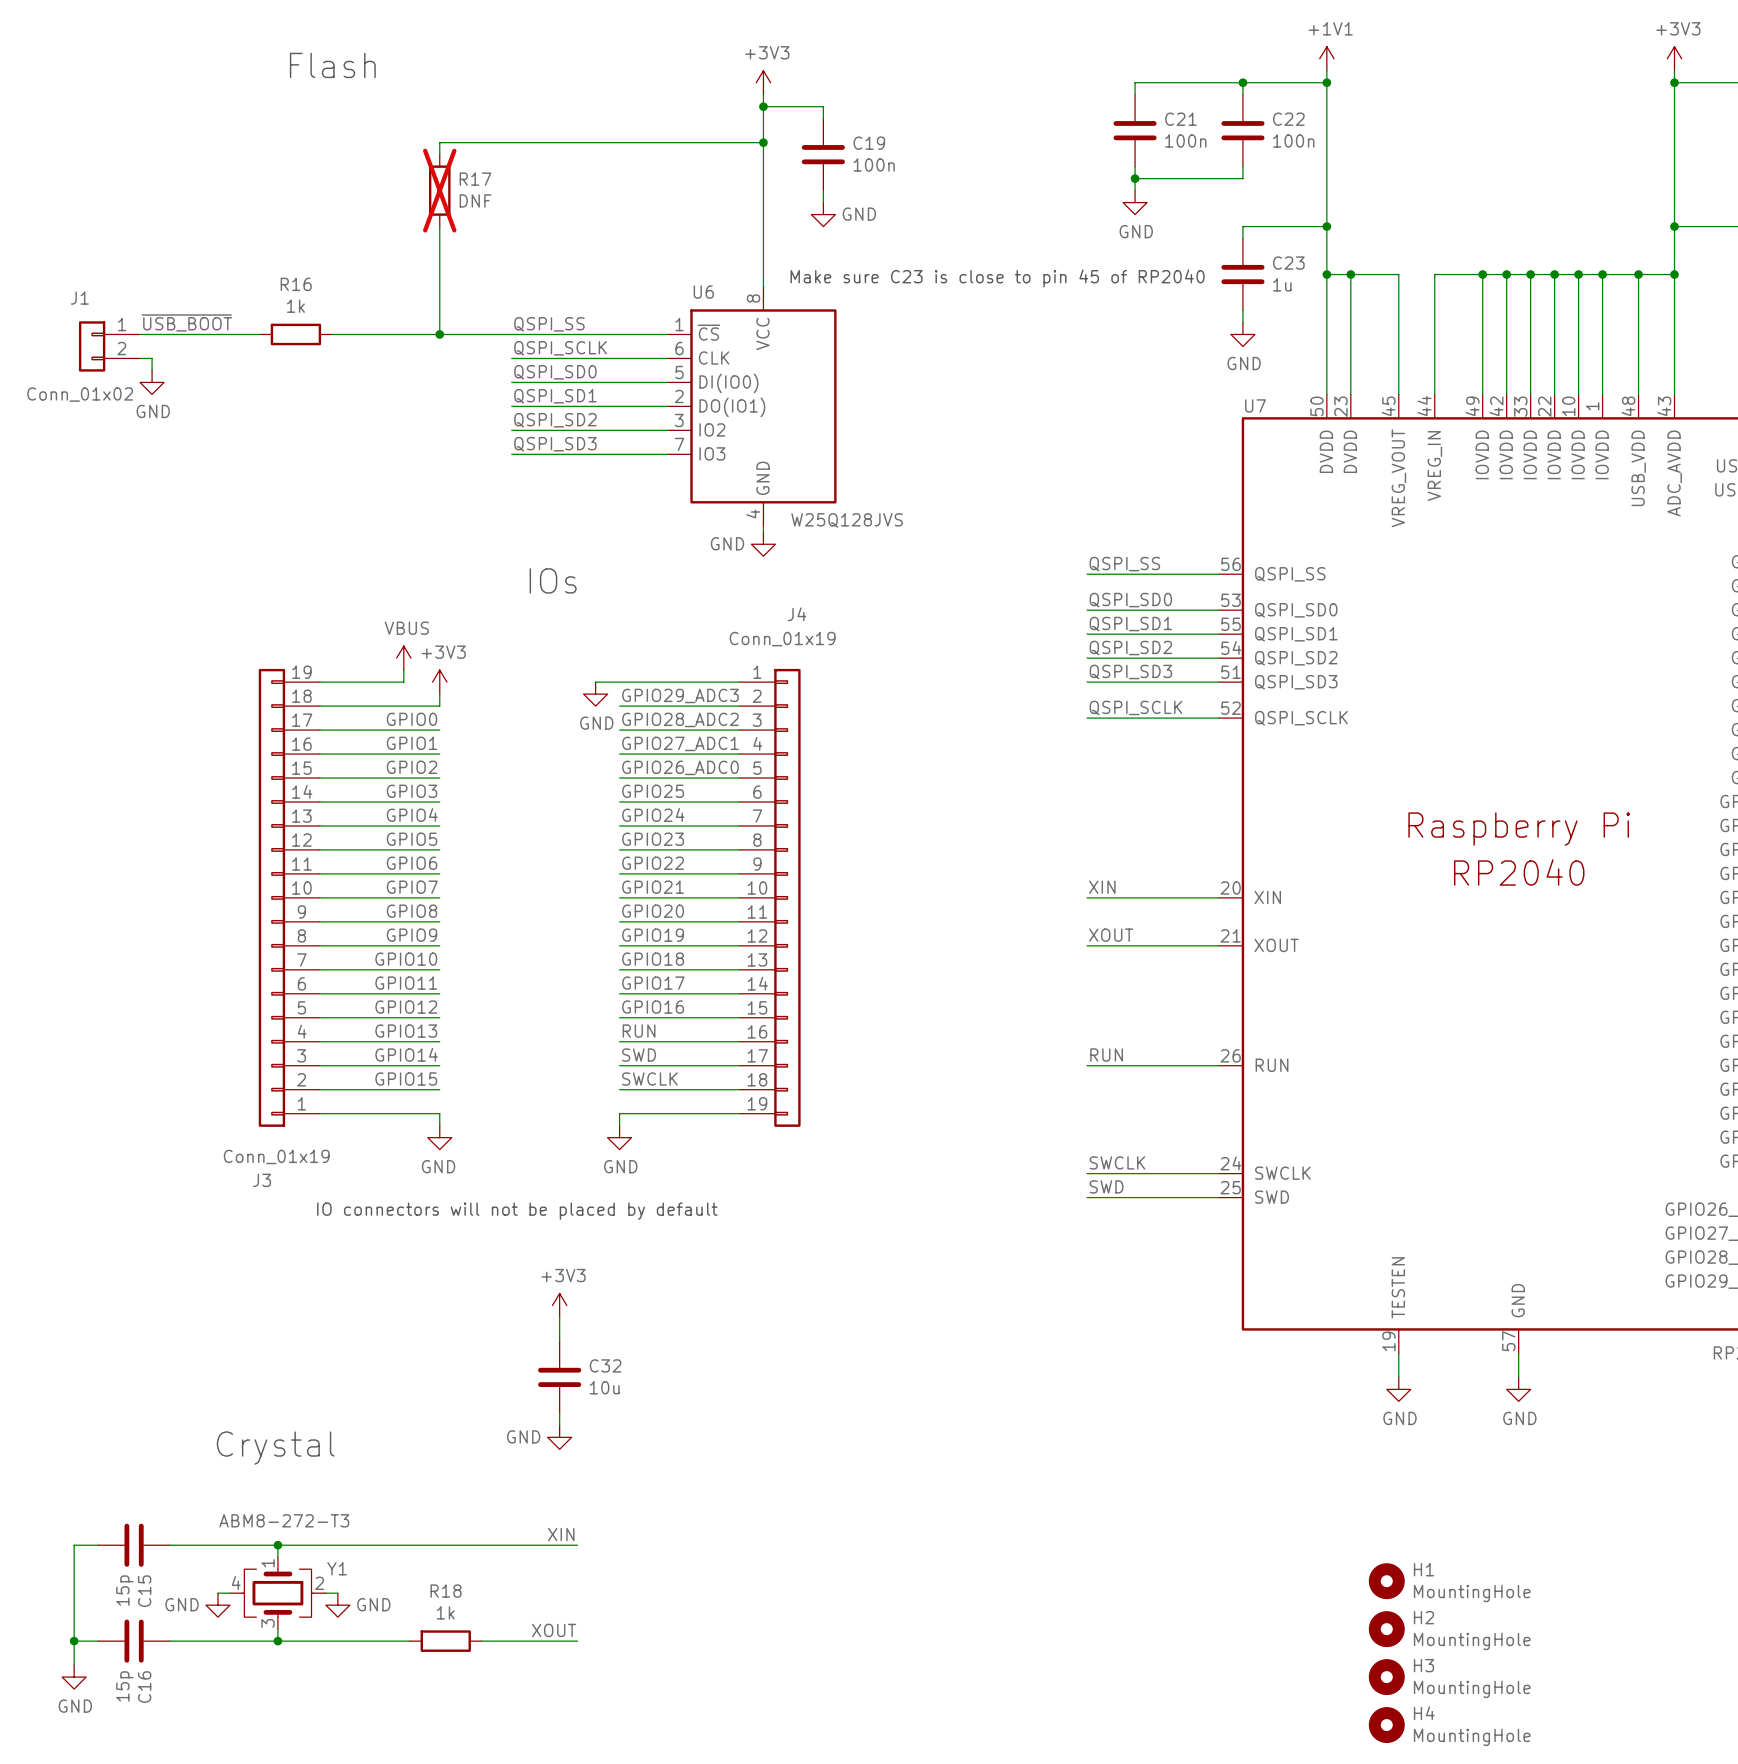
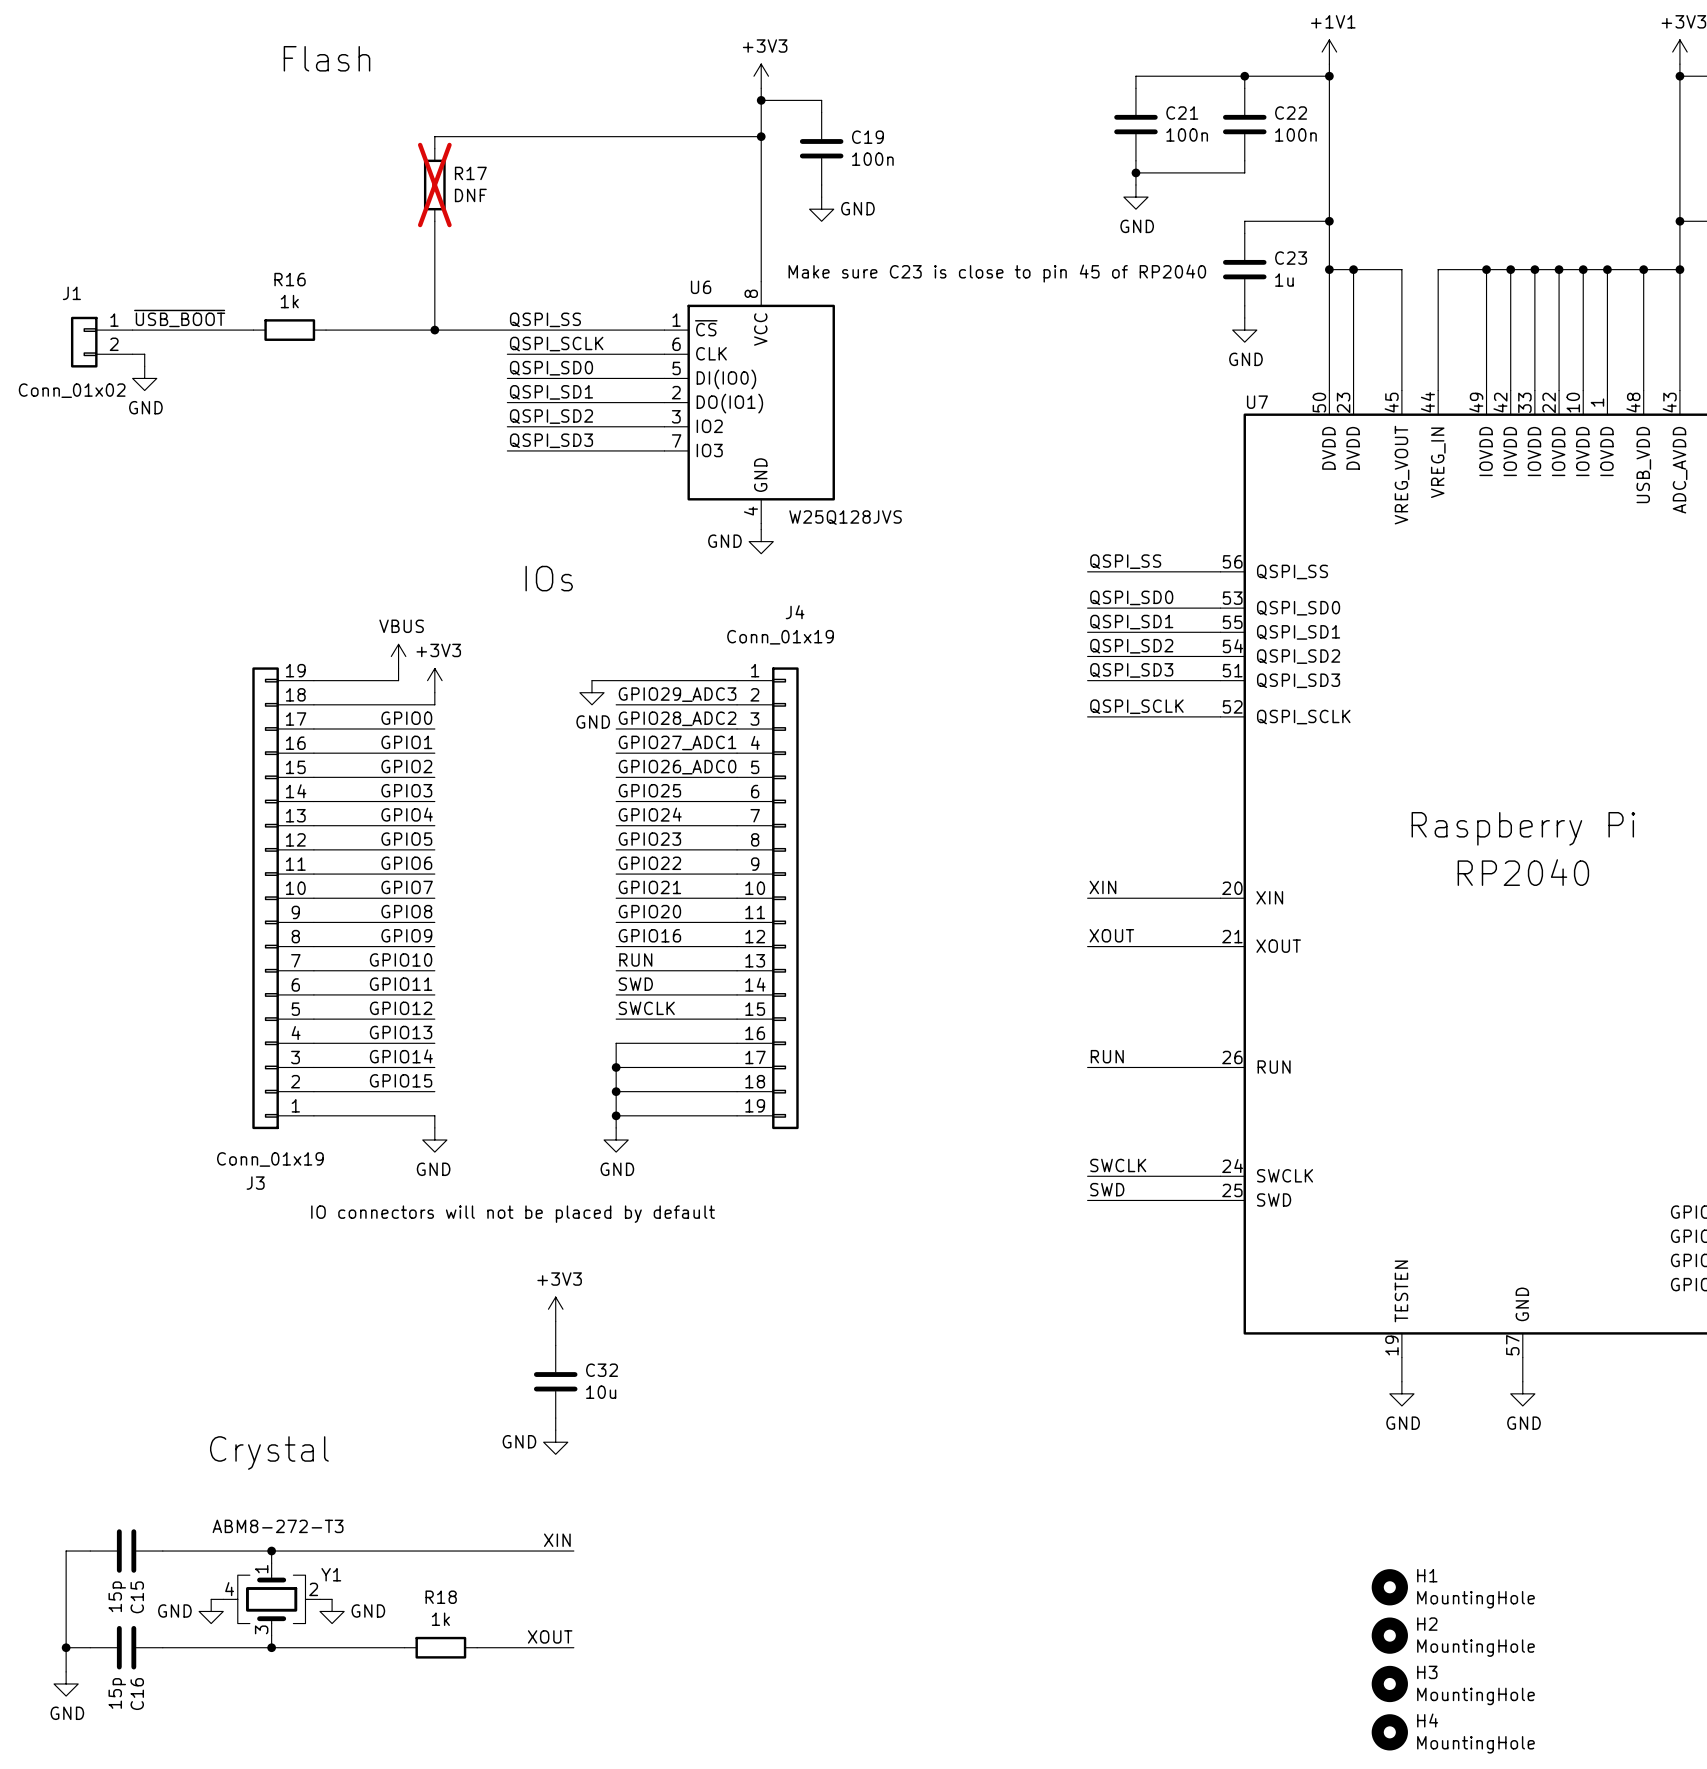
label: GPIO19 (653, 935) -> GPIO16 (649, 935)
label: GPIO18 (653, 959) -> RUN (635, 959)
label: GPIO17 (653, 983) -> SWD (635, 984)
label: GPIO16 (653, 1007) -> SWCLK (646, 1008)
label: RUN (639, 1031) -> none
wire: none -> (616, 1043) (616, 1115)
label: SWD (639, 1055) -> none
junction: none -> (616, 1067)
label: SWCLK (649, 1078) -> none
junction: none -> (616, 1091)
junction: none -> (616, 1115)

